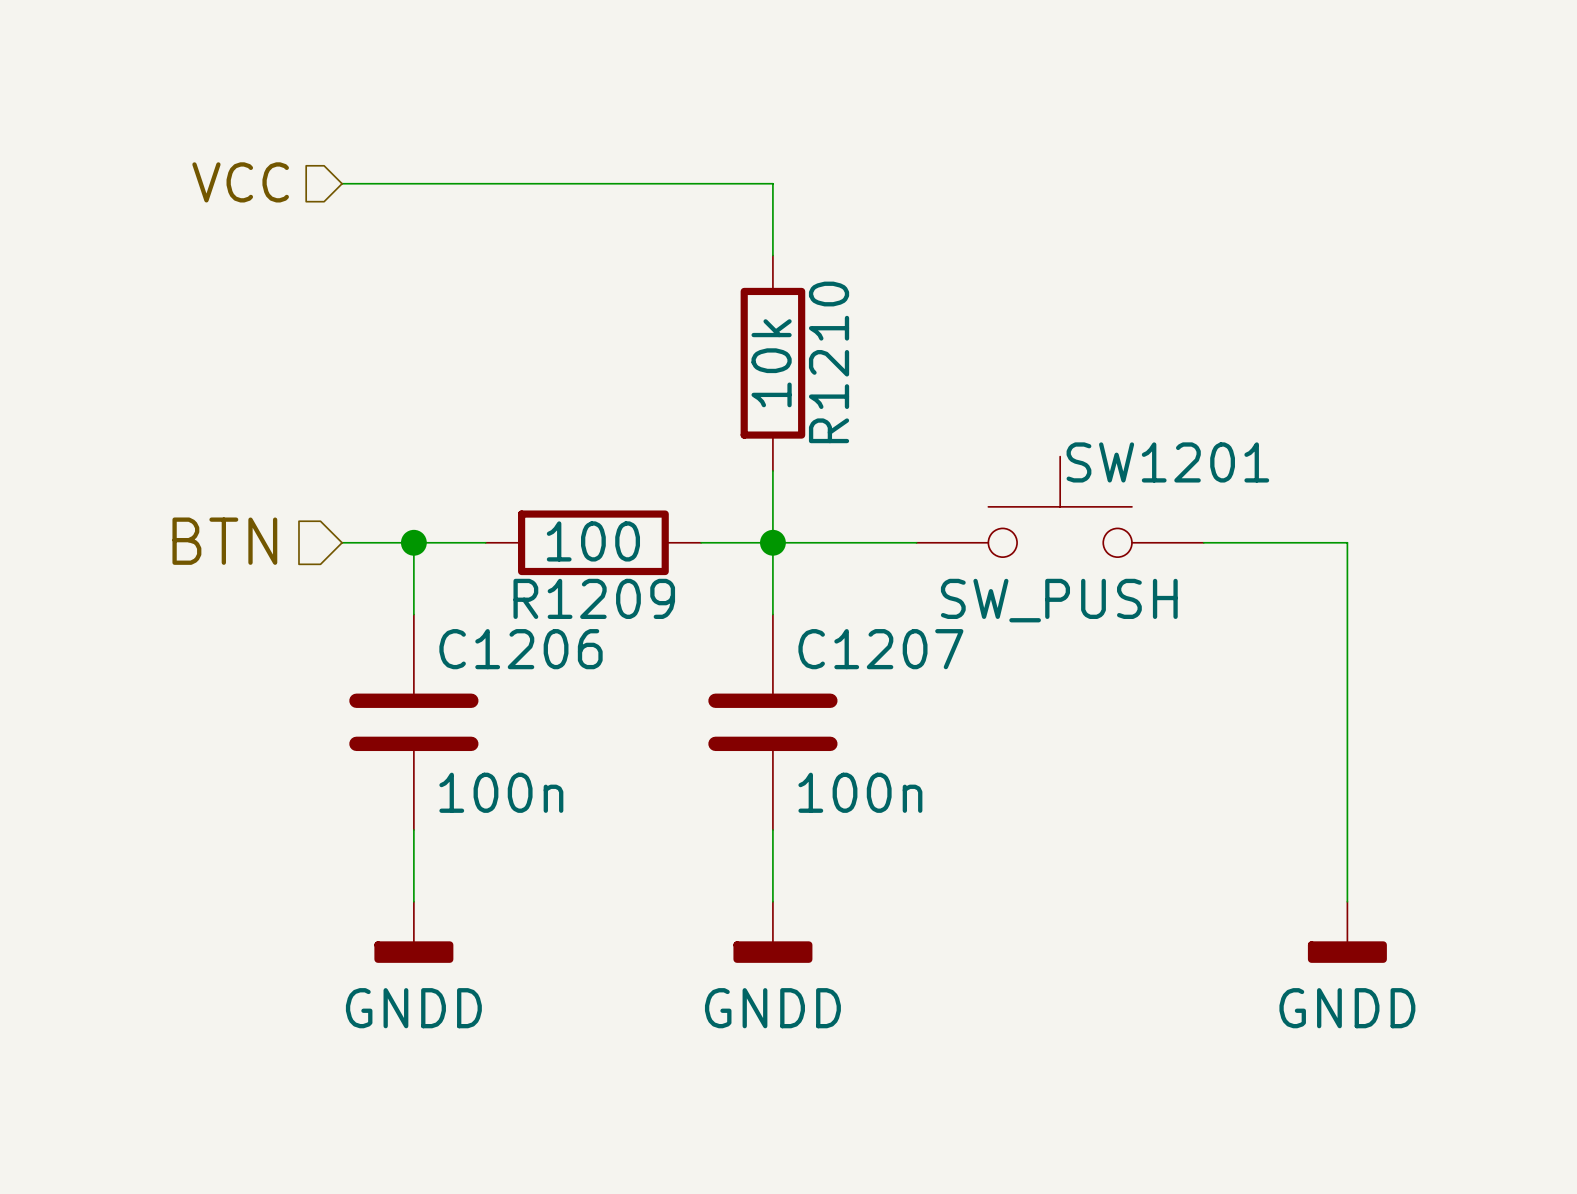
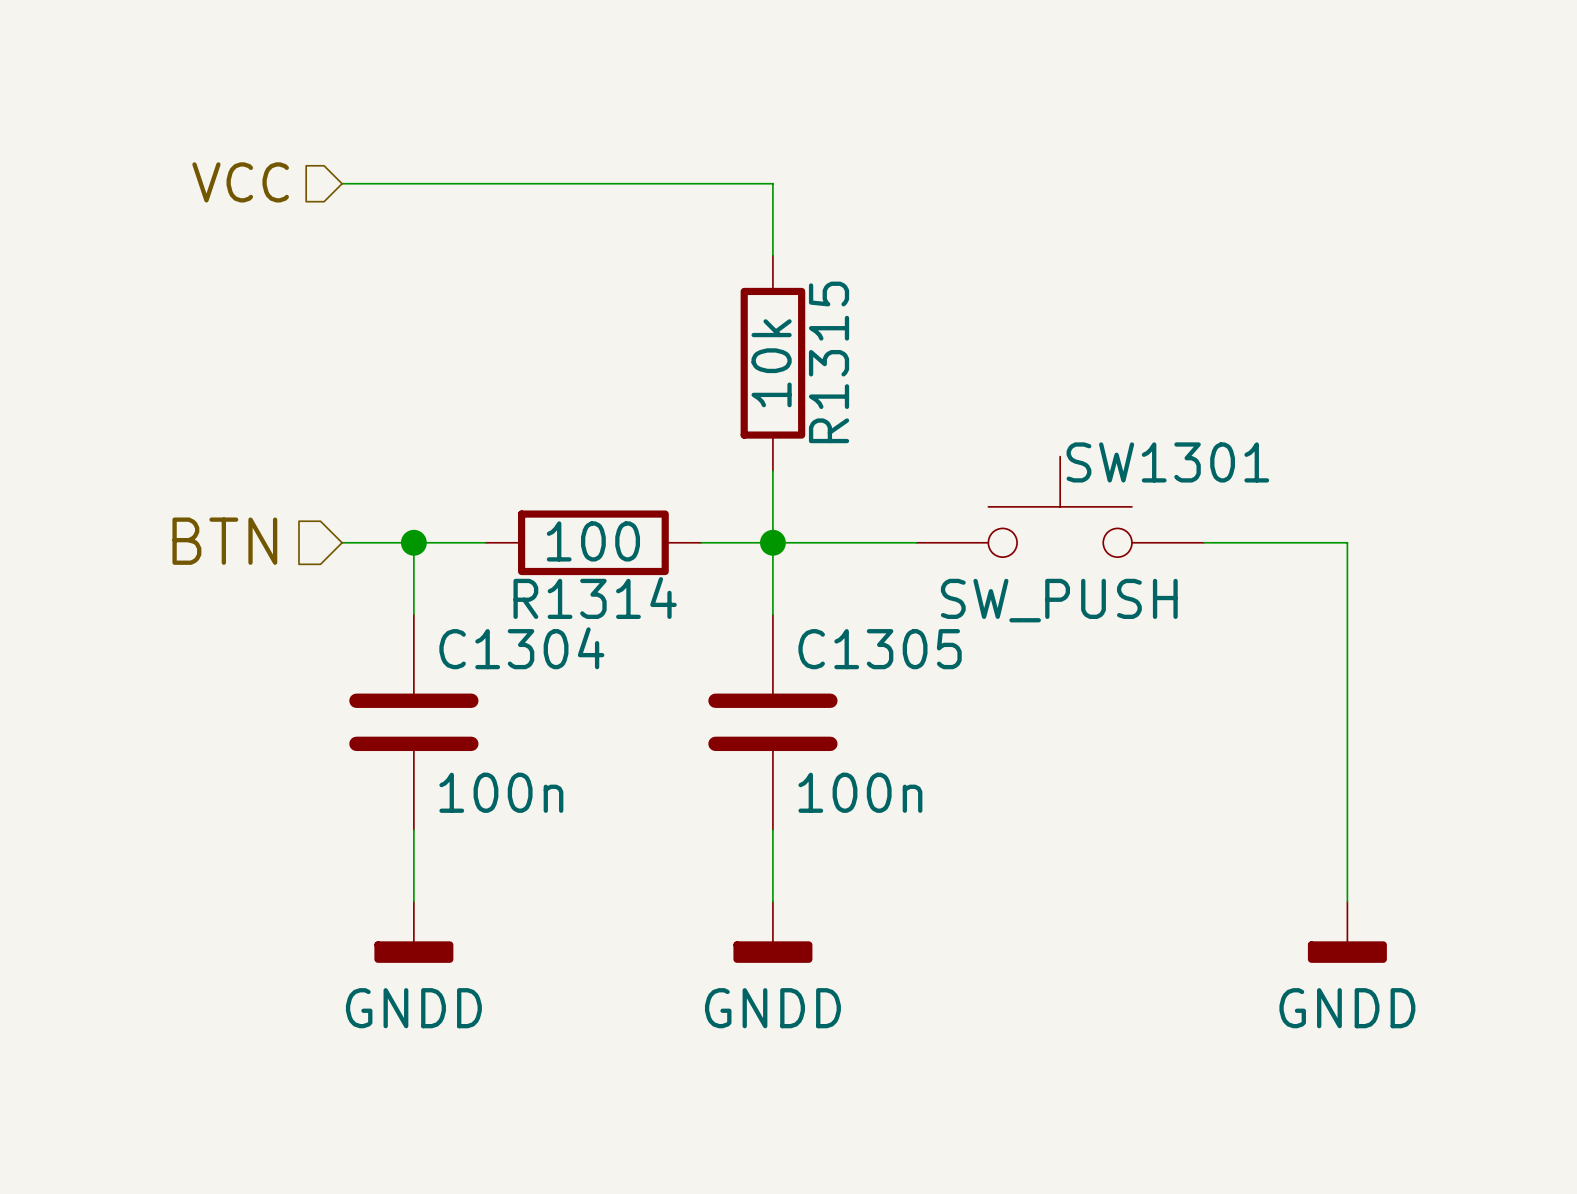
R1210 name: R1210 (829, 362) -> R1315 (829, 362)
SW1201 name: SW1201 (1167, 462) -> SW1301 (1167, 462)
R1209 name: R1209 (594, 598) -> R1314 (595, 598)
C1206 name: C1206 (521, 649) -> C1304 (521, 648)
C1207 name: C1207 (880, 649) -> C1305 (880, 649)

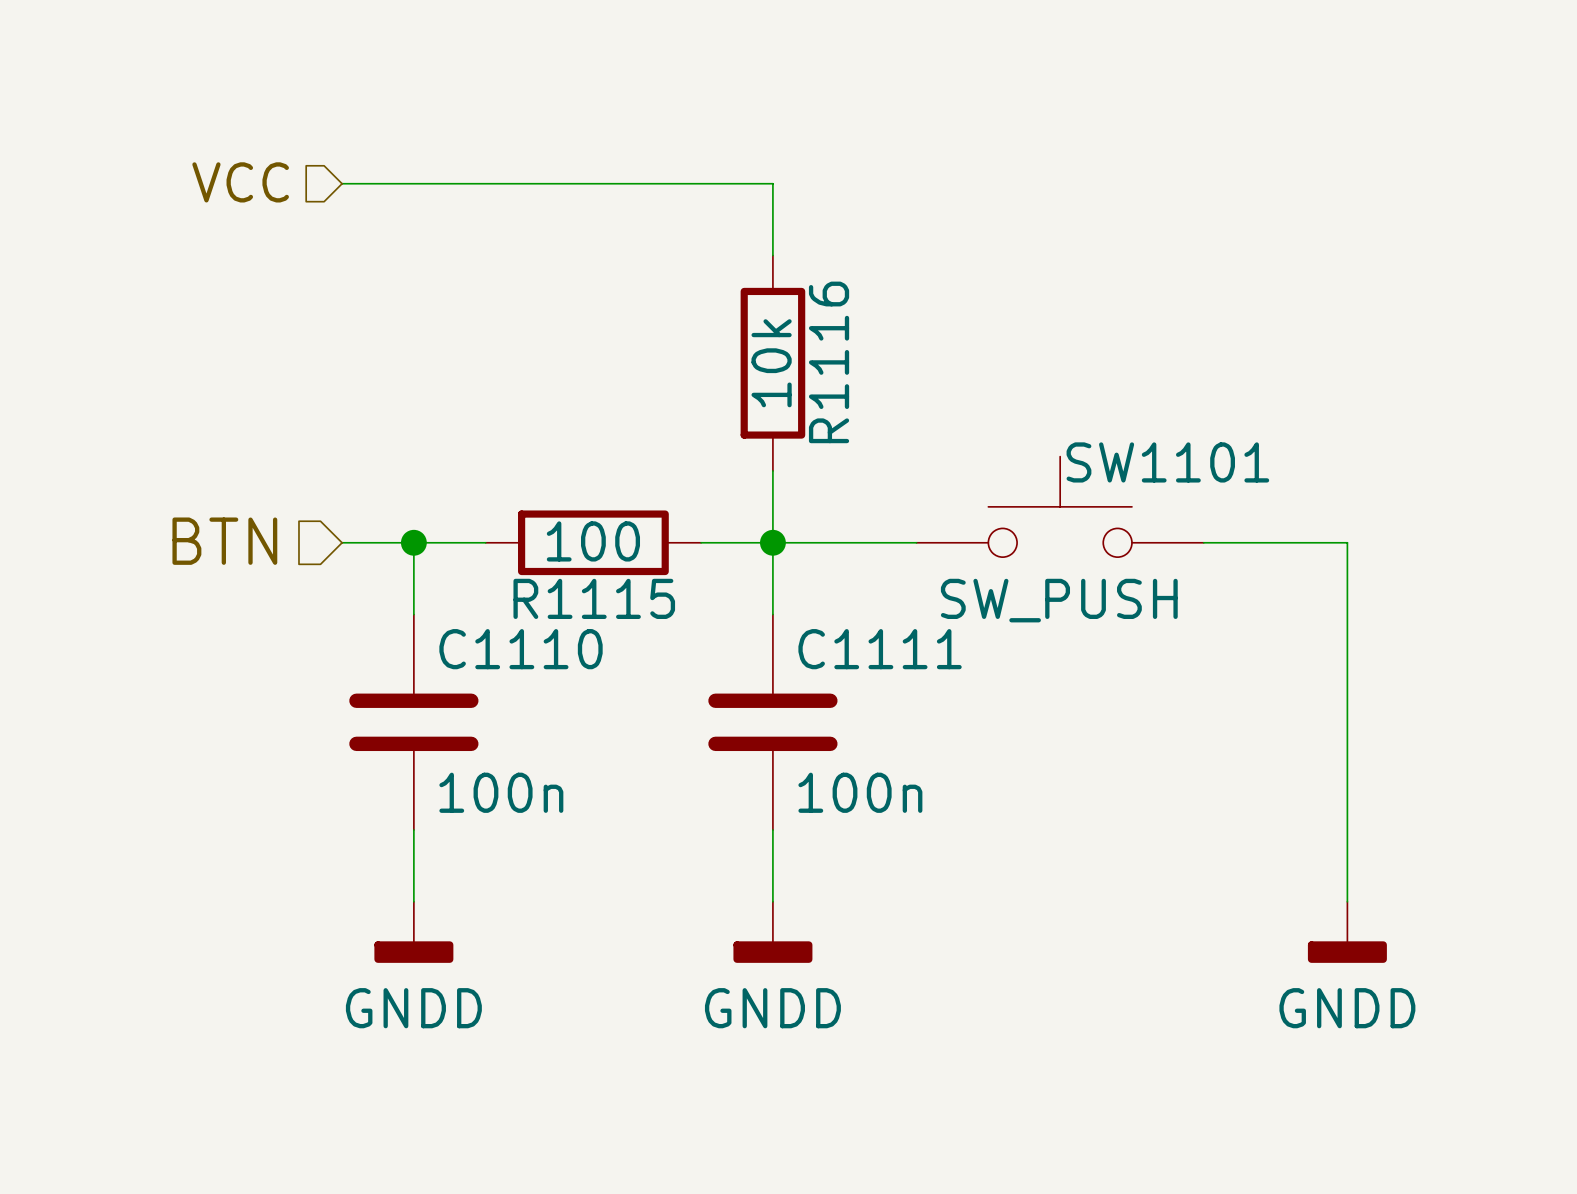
R1315 name: R1315 (829, 362) -> R1116 (829, 362)
SW1301 name: SW1301 (1167, 462) -> SW1101 (1167, 462)
R1314 name: R1314 (595, 598) -> R1115 (594, 598)
C1304 name: C1304 (521, 648) -> C1110 (521, 649)
C1305 name: C1305 (880, 649) -> C1111 (880, 649)

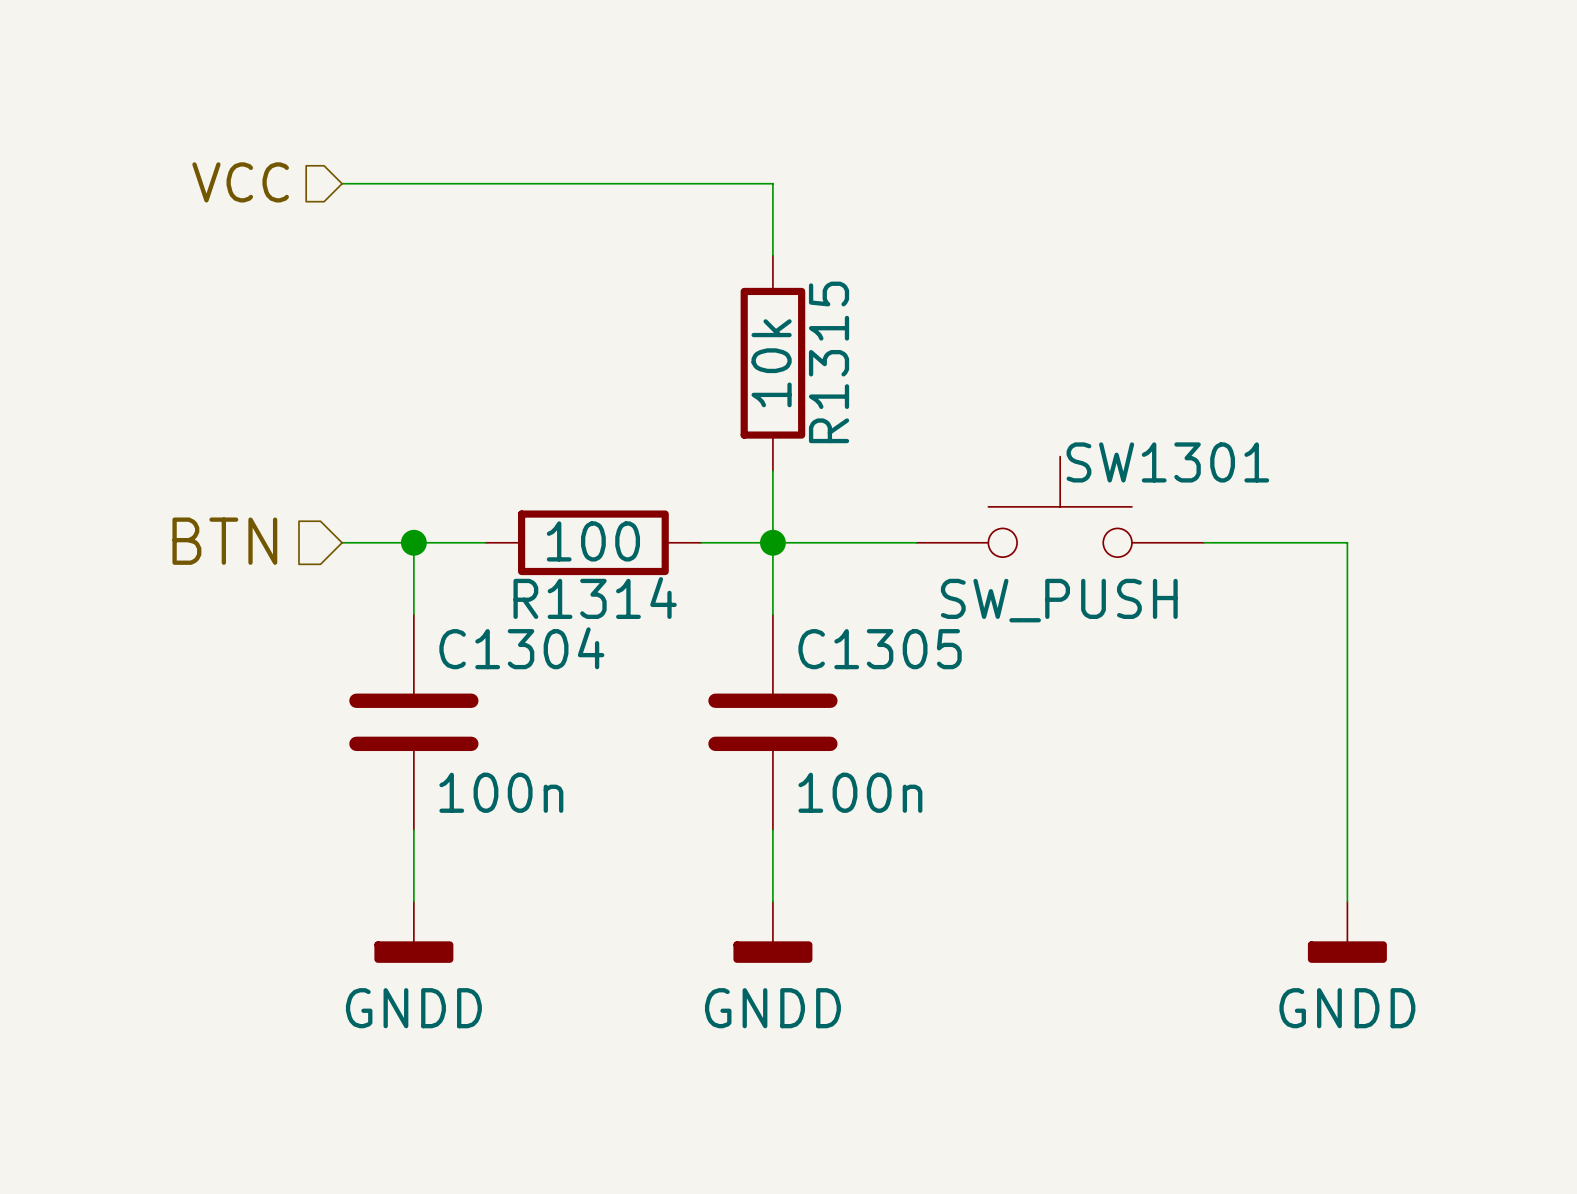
R1116 name: R1116 (829, 362) -> R1315 (829, 362)
SW1101 name: SW1101 (1167, 462) -> SW1301 (1167, 462)
R1115 name: R1115 (594, 598) -> R1314 (595, 598)
C1110 name: C1110 (521, 649) -> C1304 (521, 648)
C1111 name: C1111 (880, 649) -> C1305 (880, 649)

